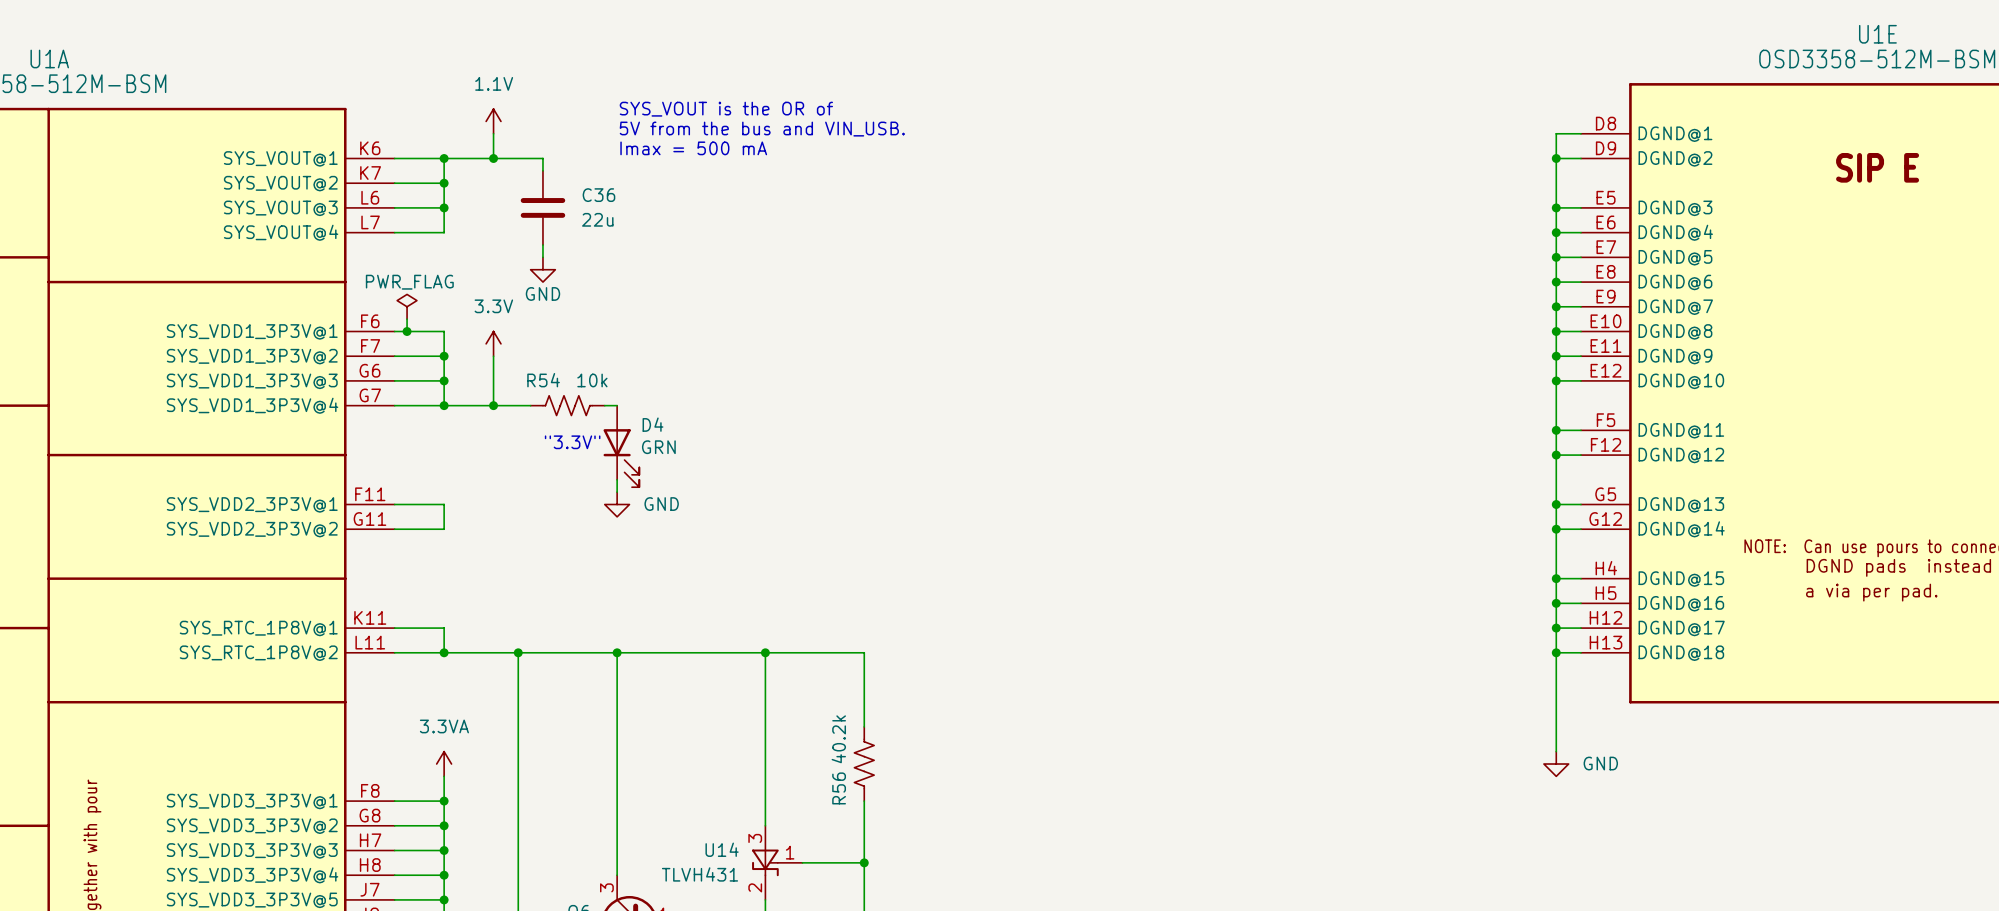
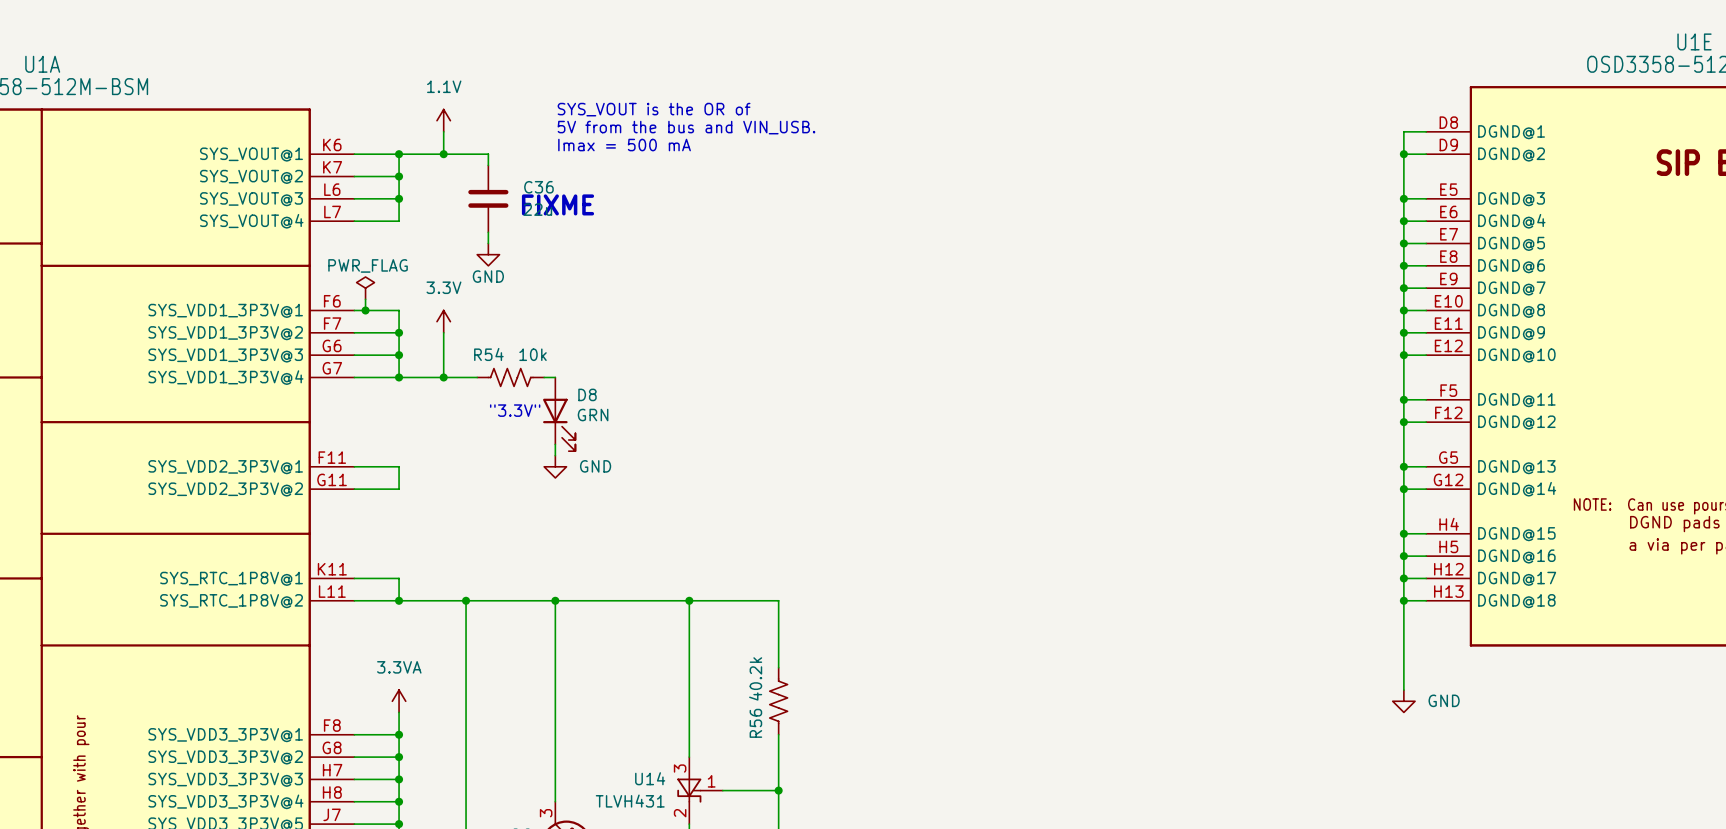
text: none -> FIXME (558, 204)
D4 name: D4 (652, 424) -> D8 (587, 394)

